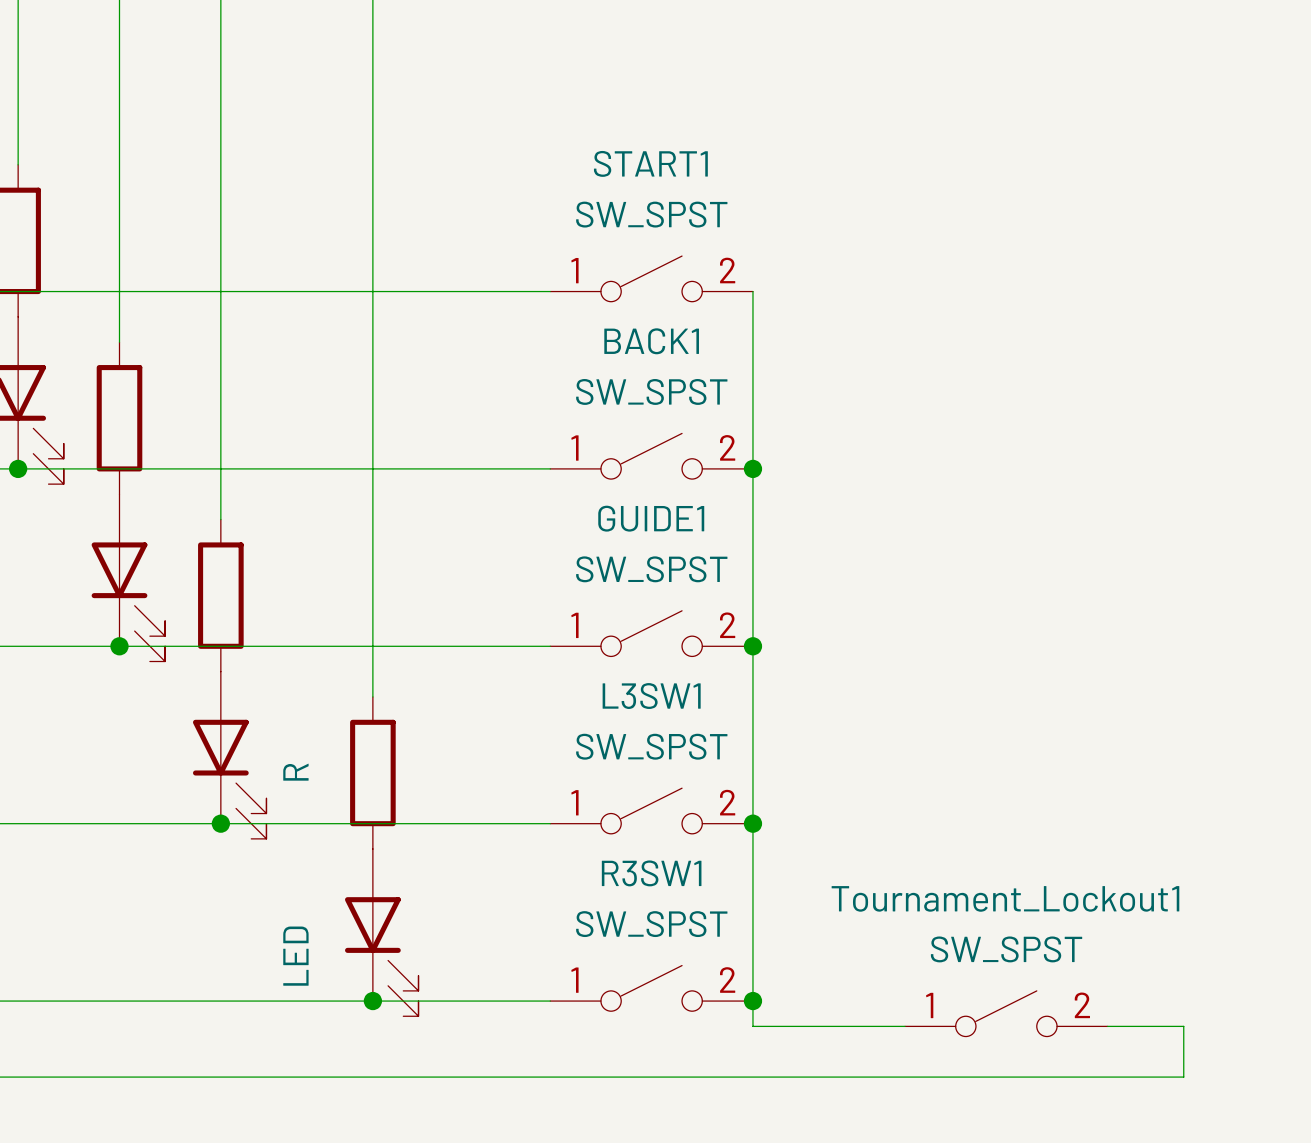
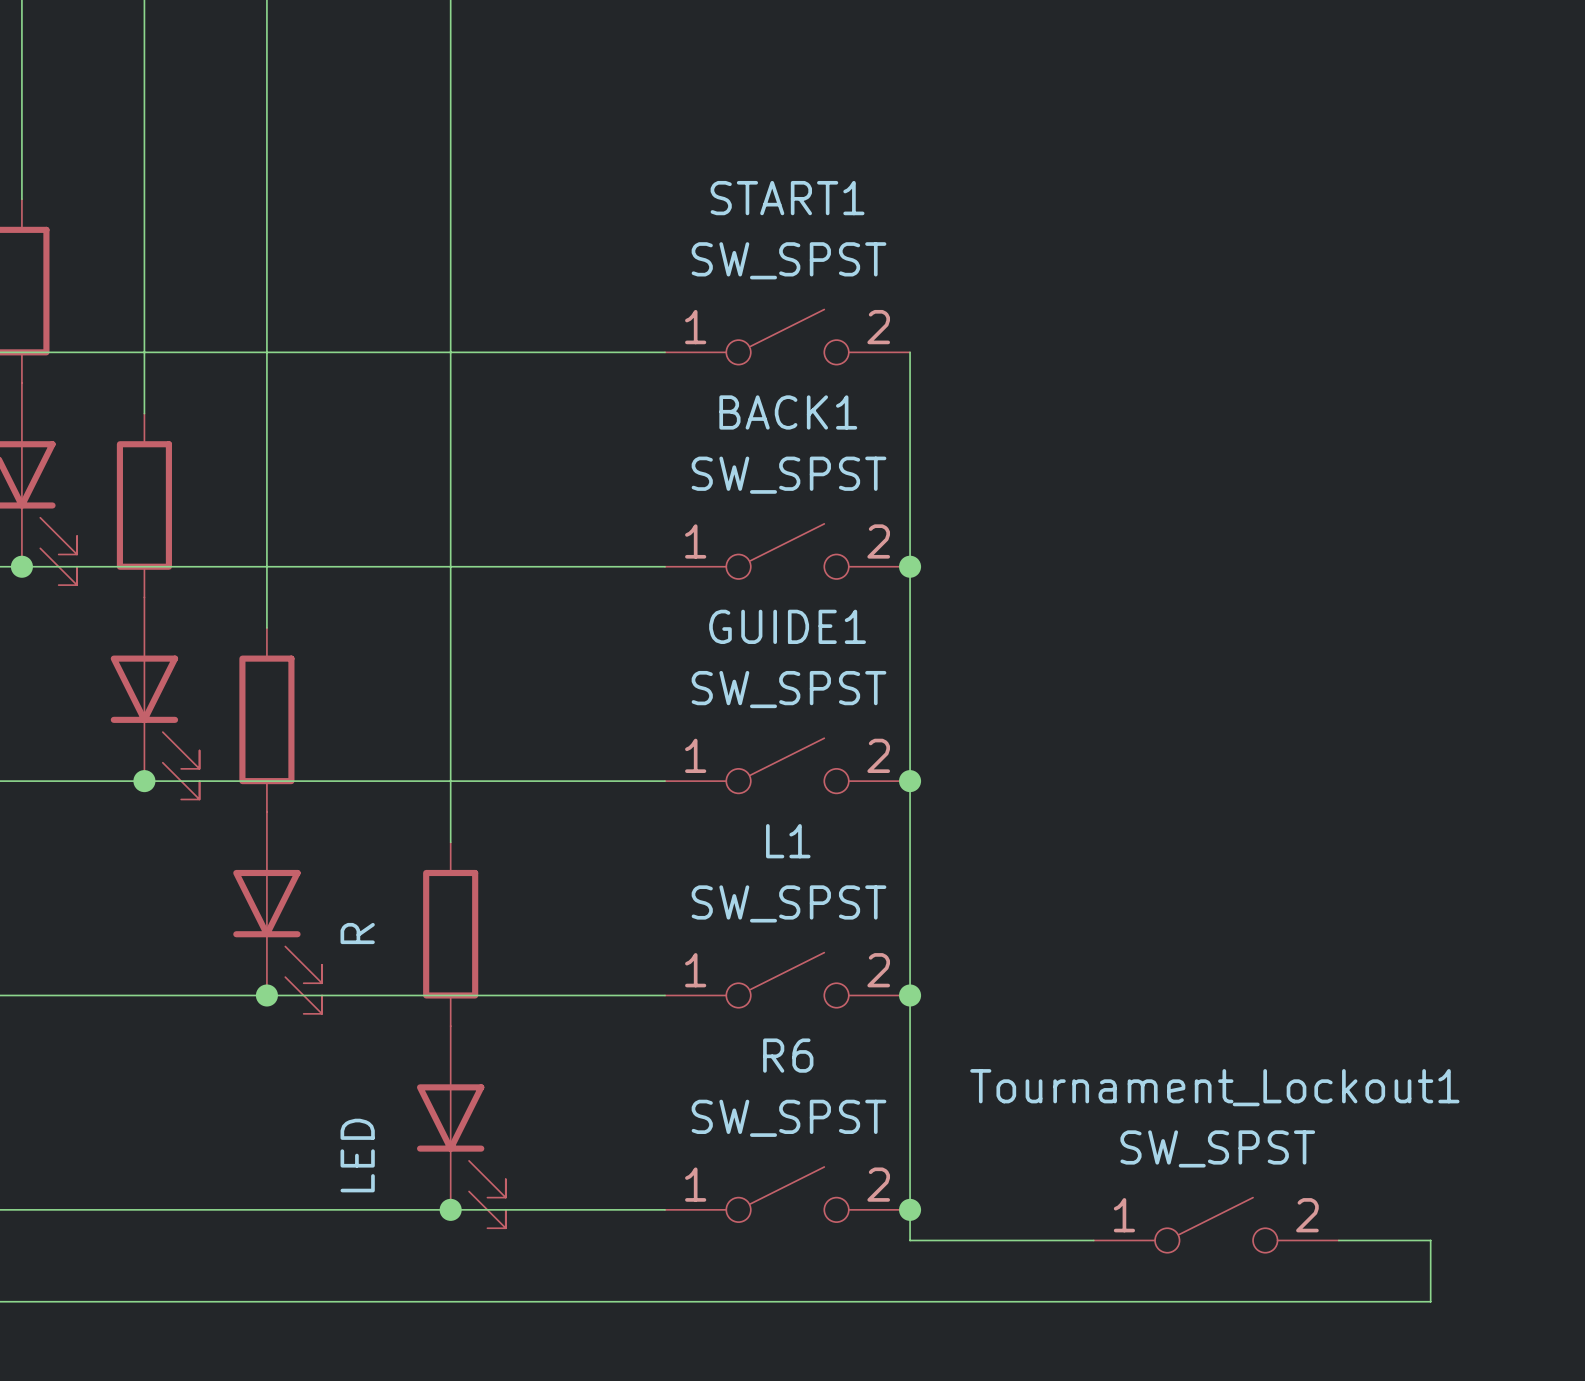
L3SW1 name: L3SW1 (651, 696) -> L1 (788, 841)
R3SW1 name: R3SW1 (651, 873) -> R6 (788, 1055)

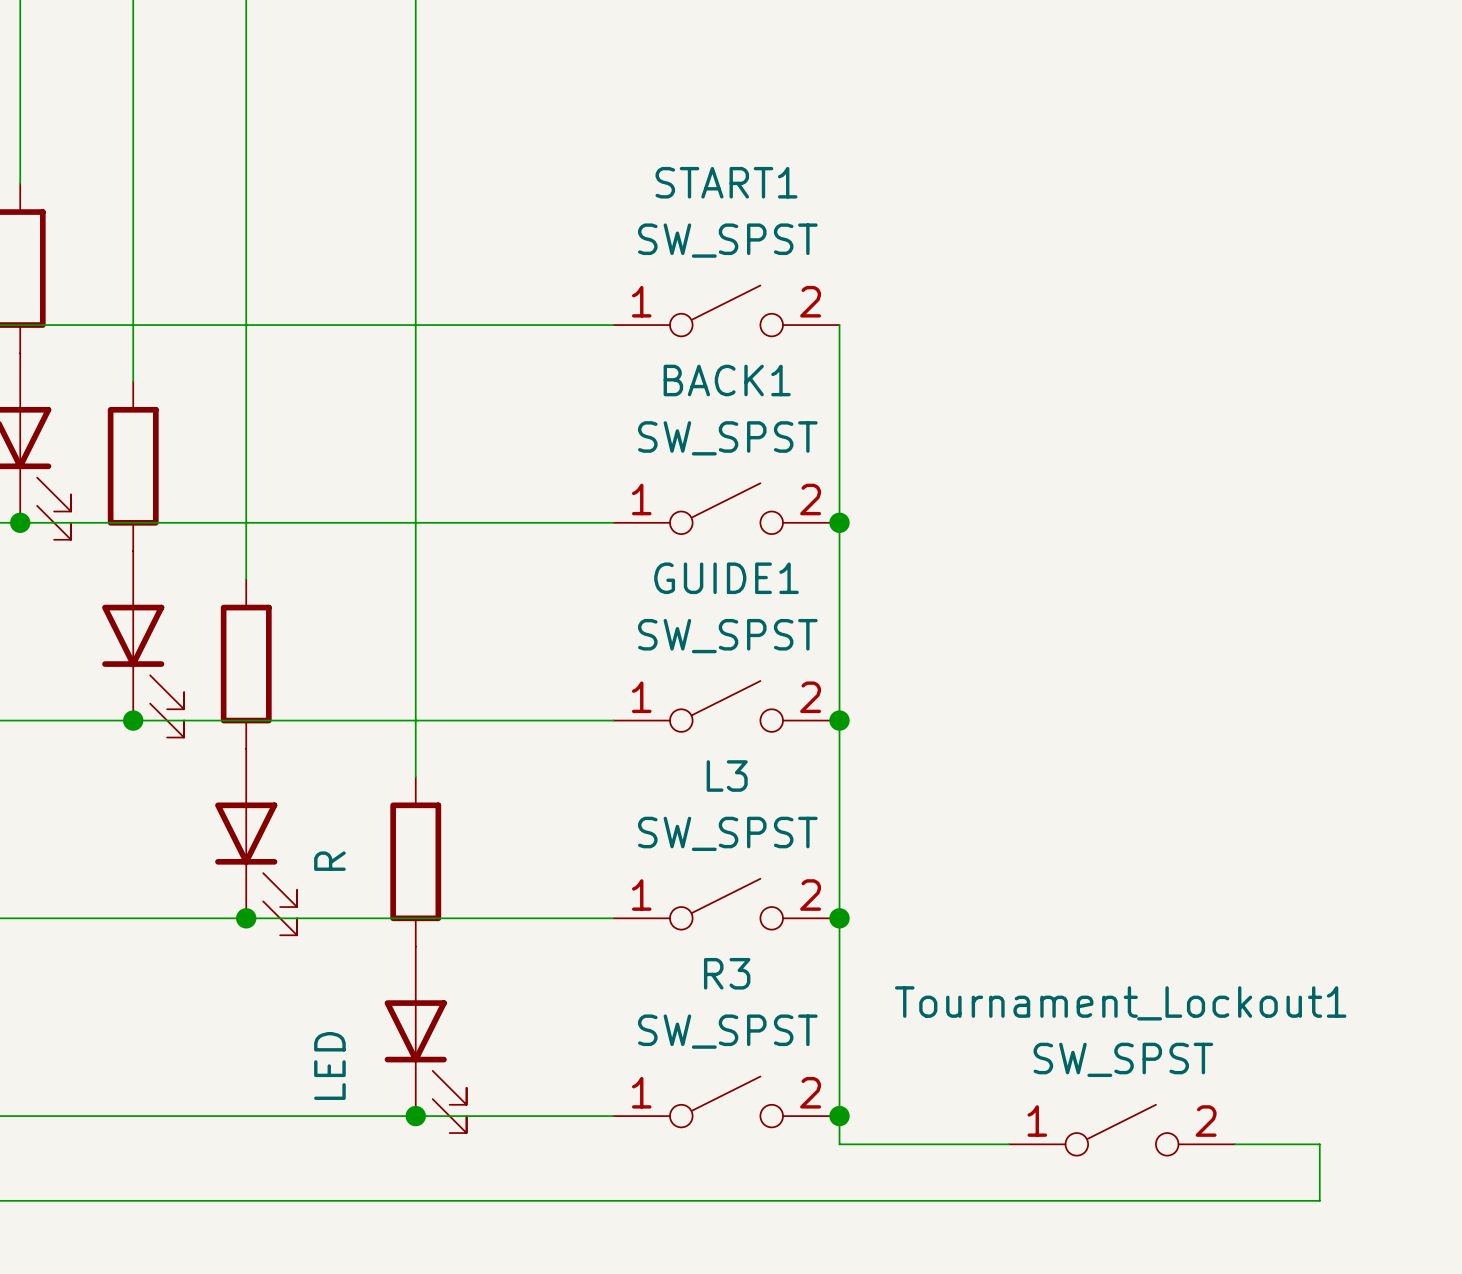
L1 name: L1 (788, 841) -> L3 (727, 776)
R6 name: R6 (788, 1055) -> R3 (727, 973)

